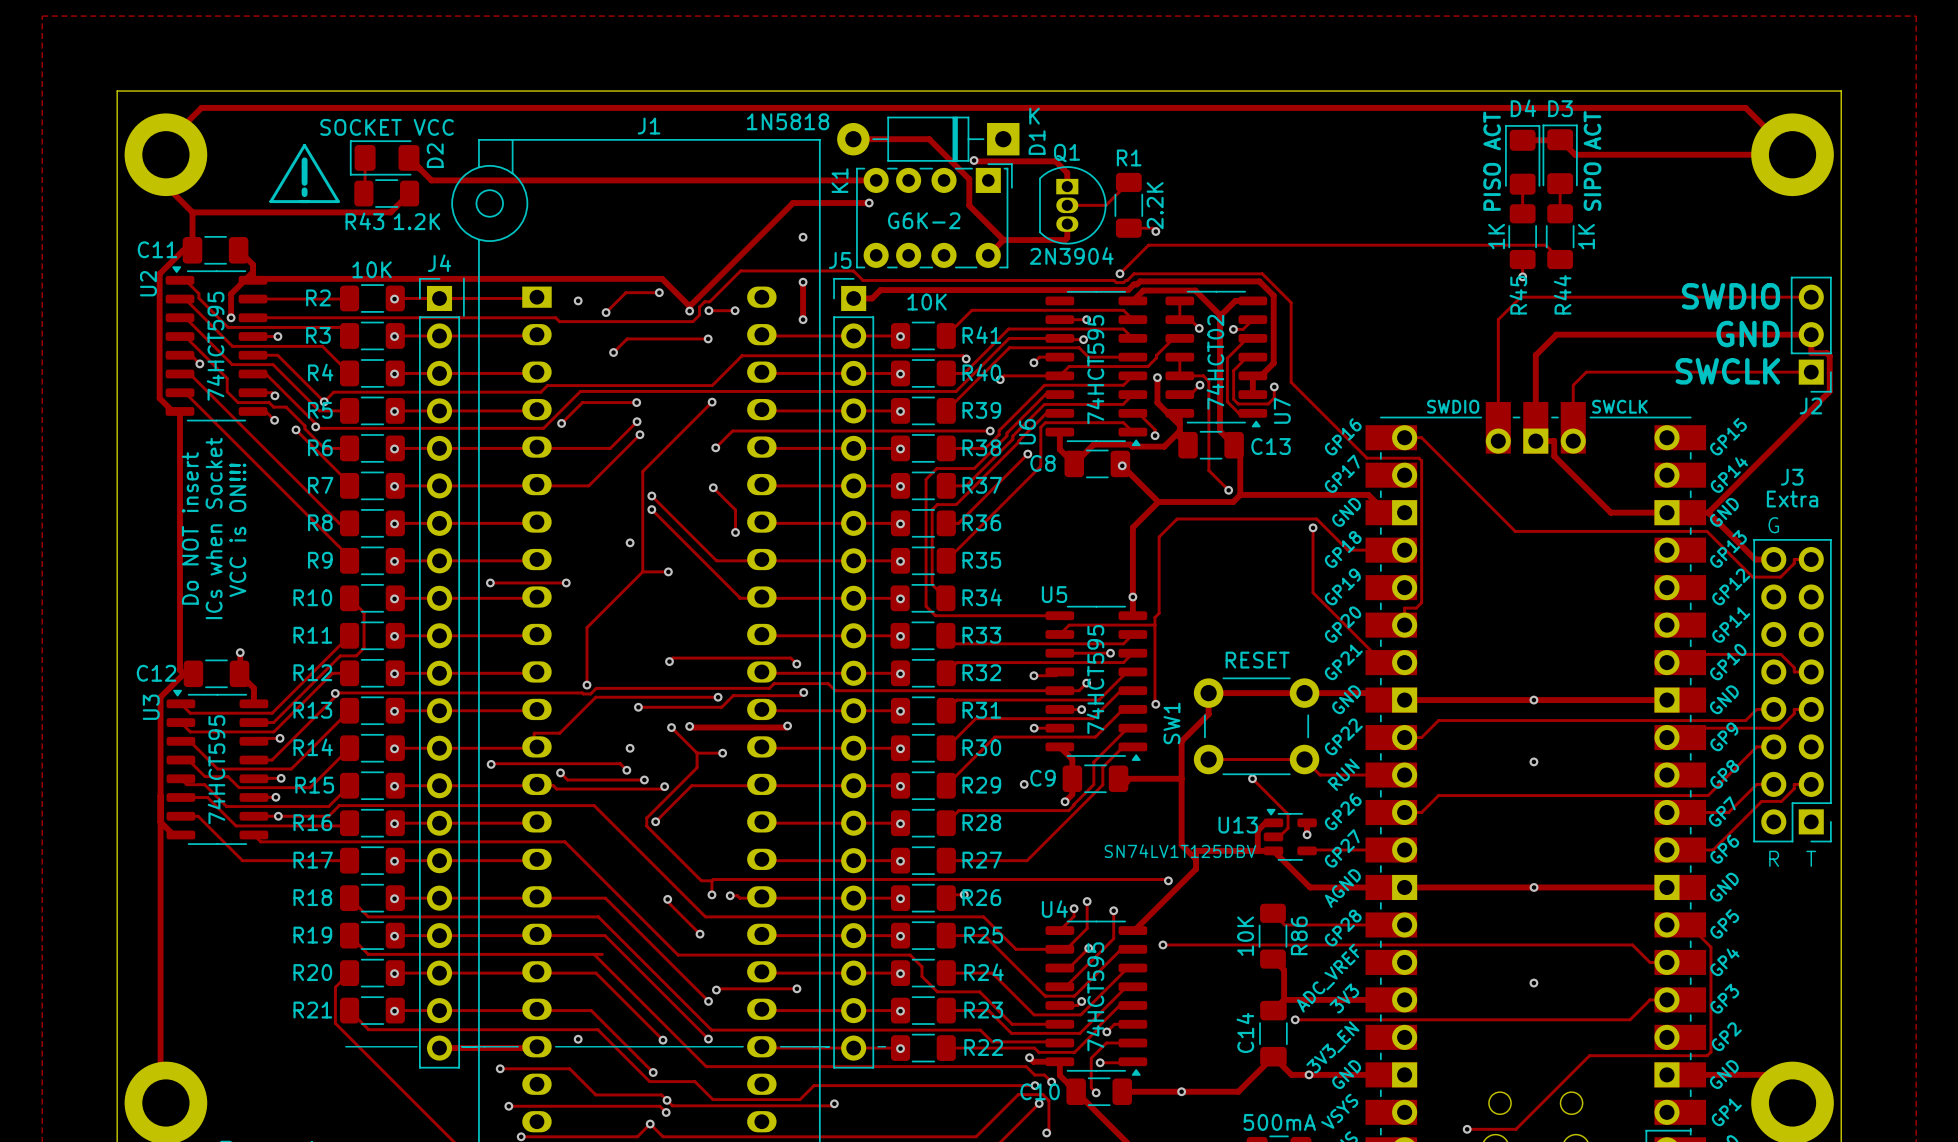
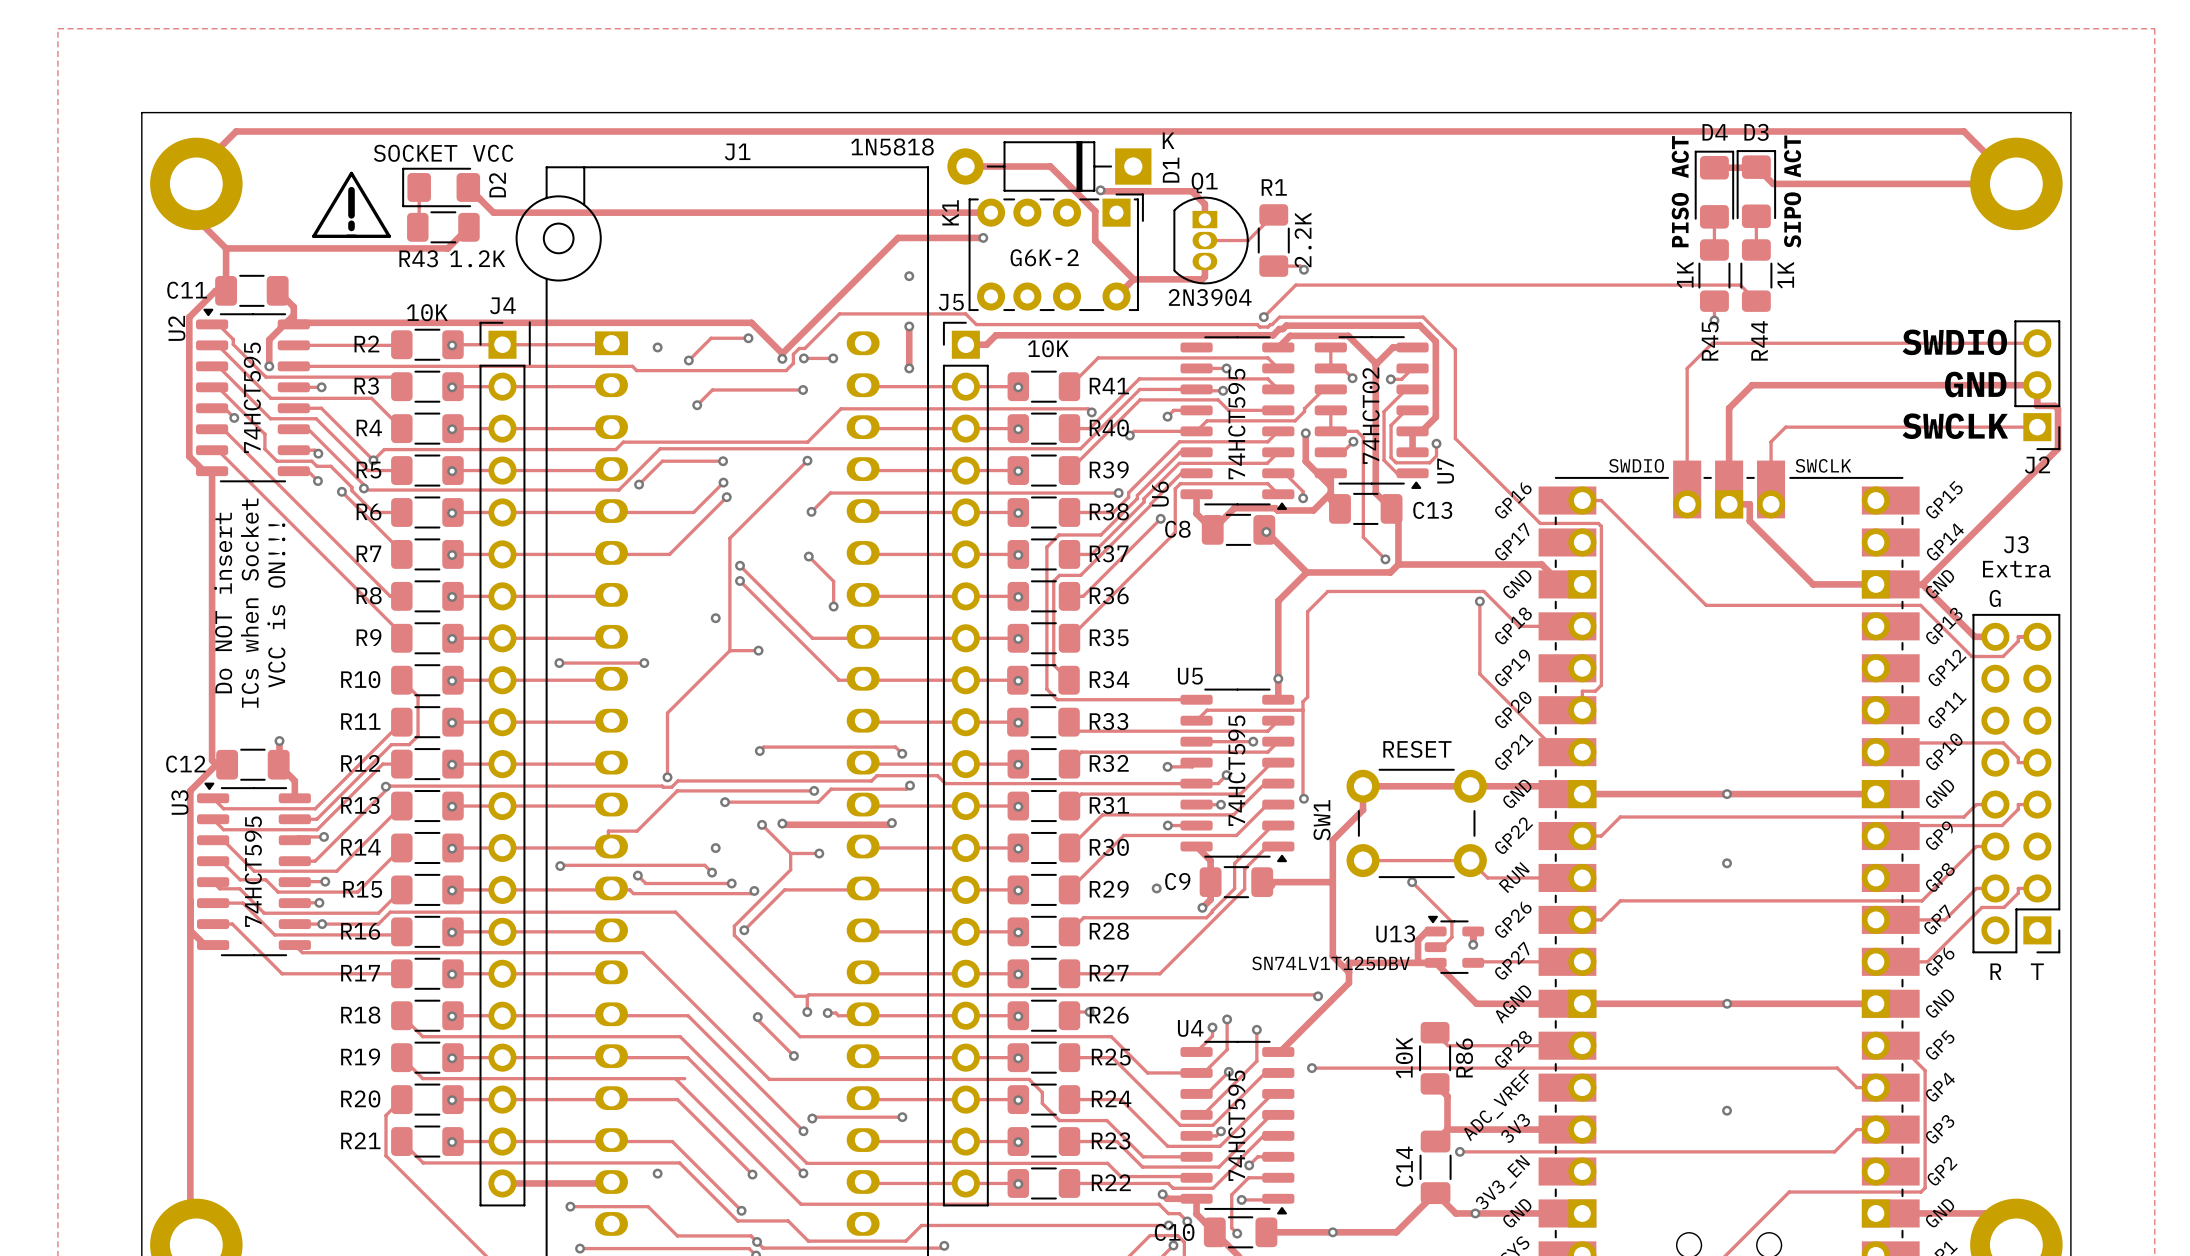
line: (345, 1046) (417, 1046) -> none
line: (462, 1046) (518, 1046) -> none
line: (555, 1046) (743, 1046) -> none
line: (780, 1046) (829, 1046) -> none
line: (878, 1046) (885, 1046) -> none

